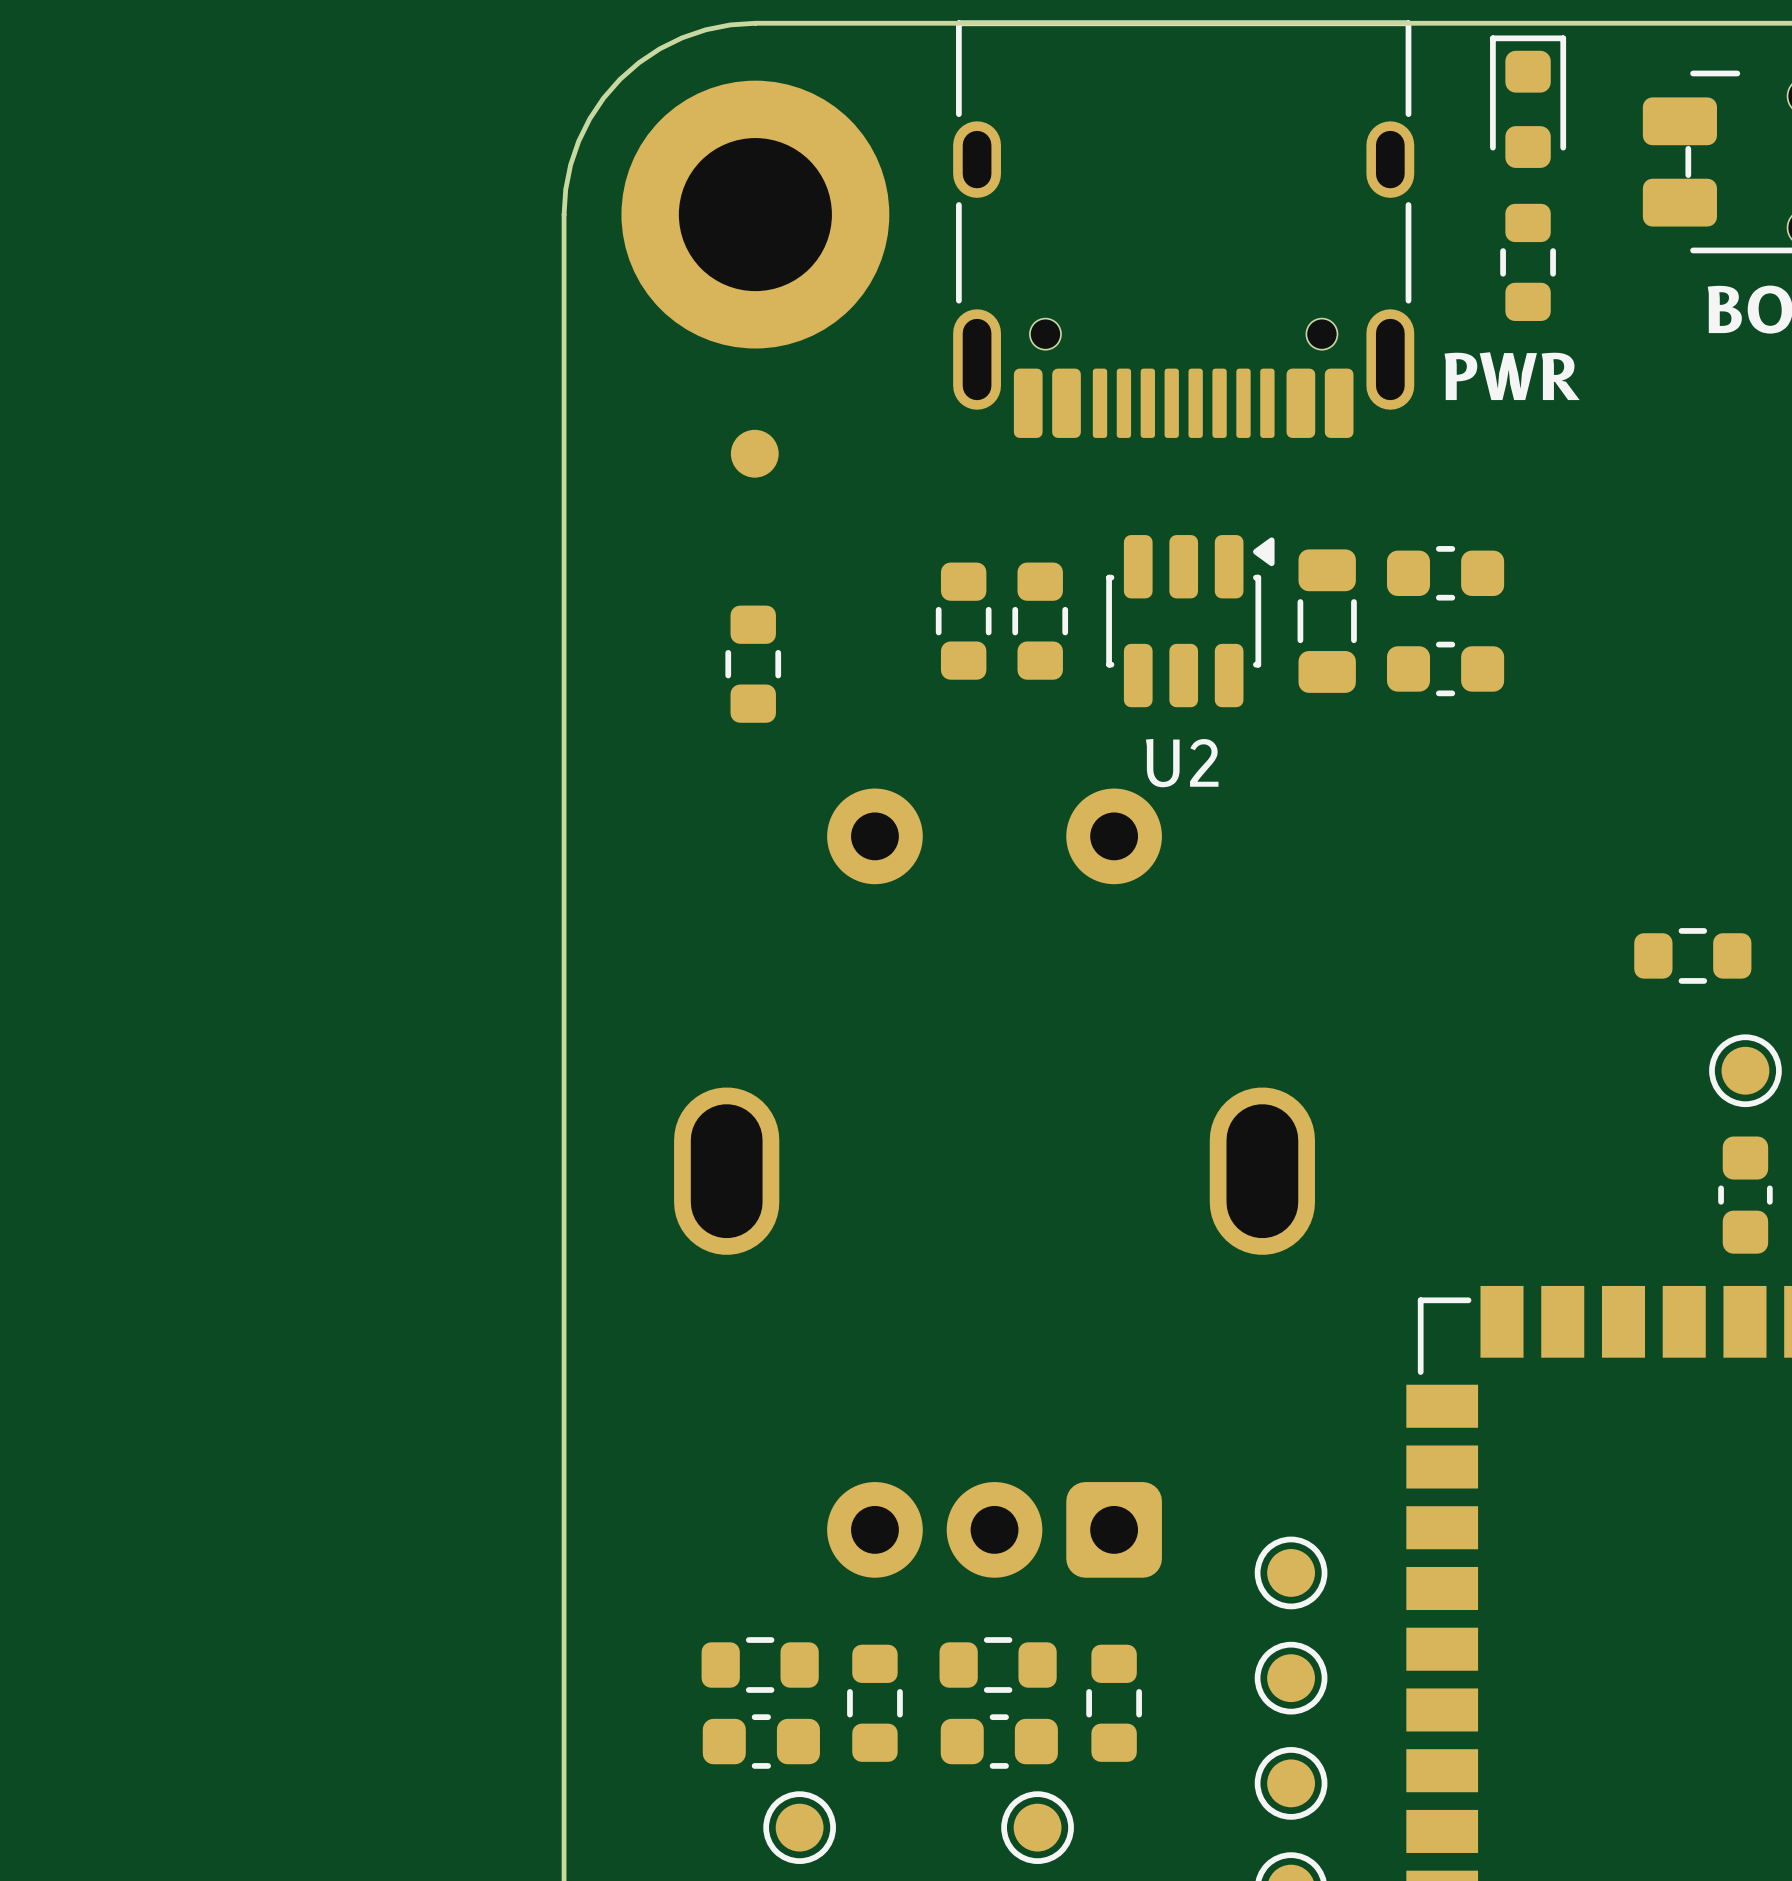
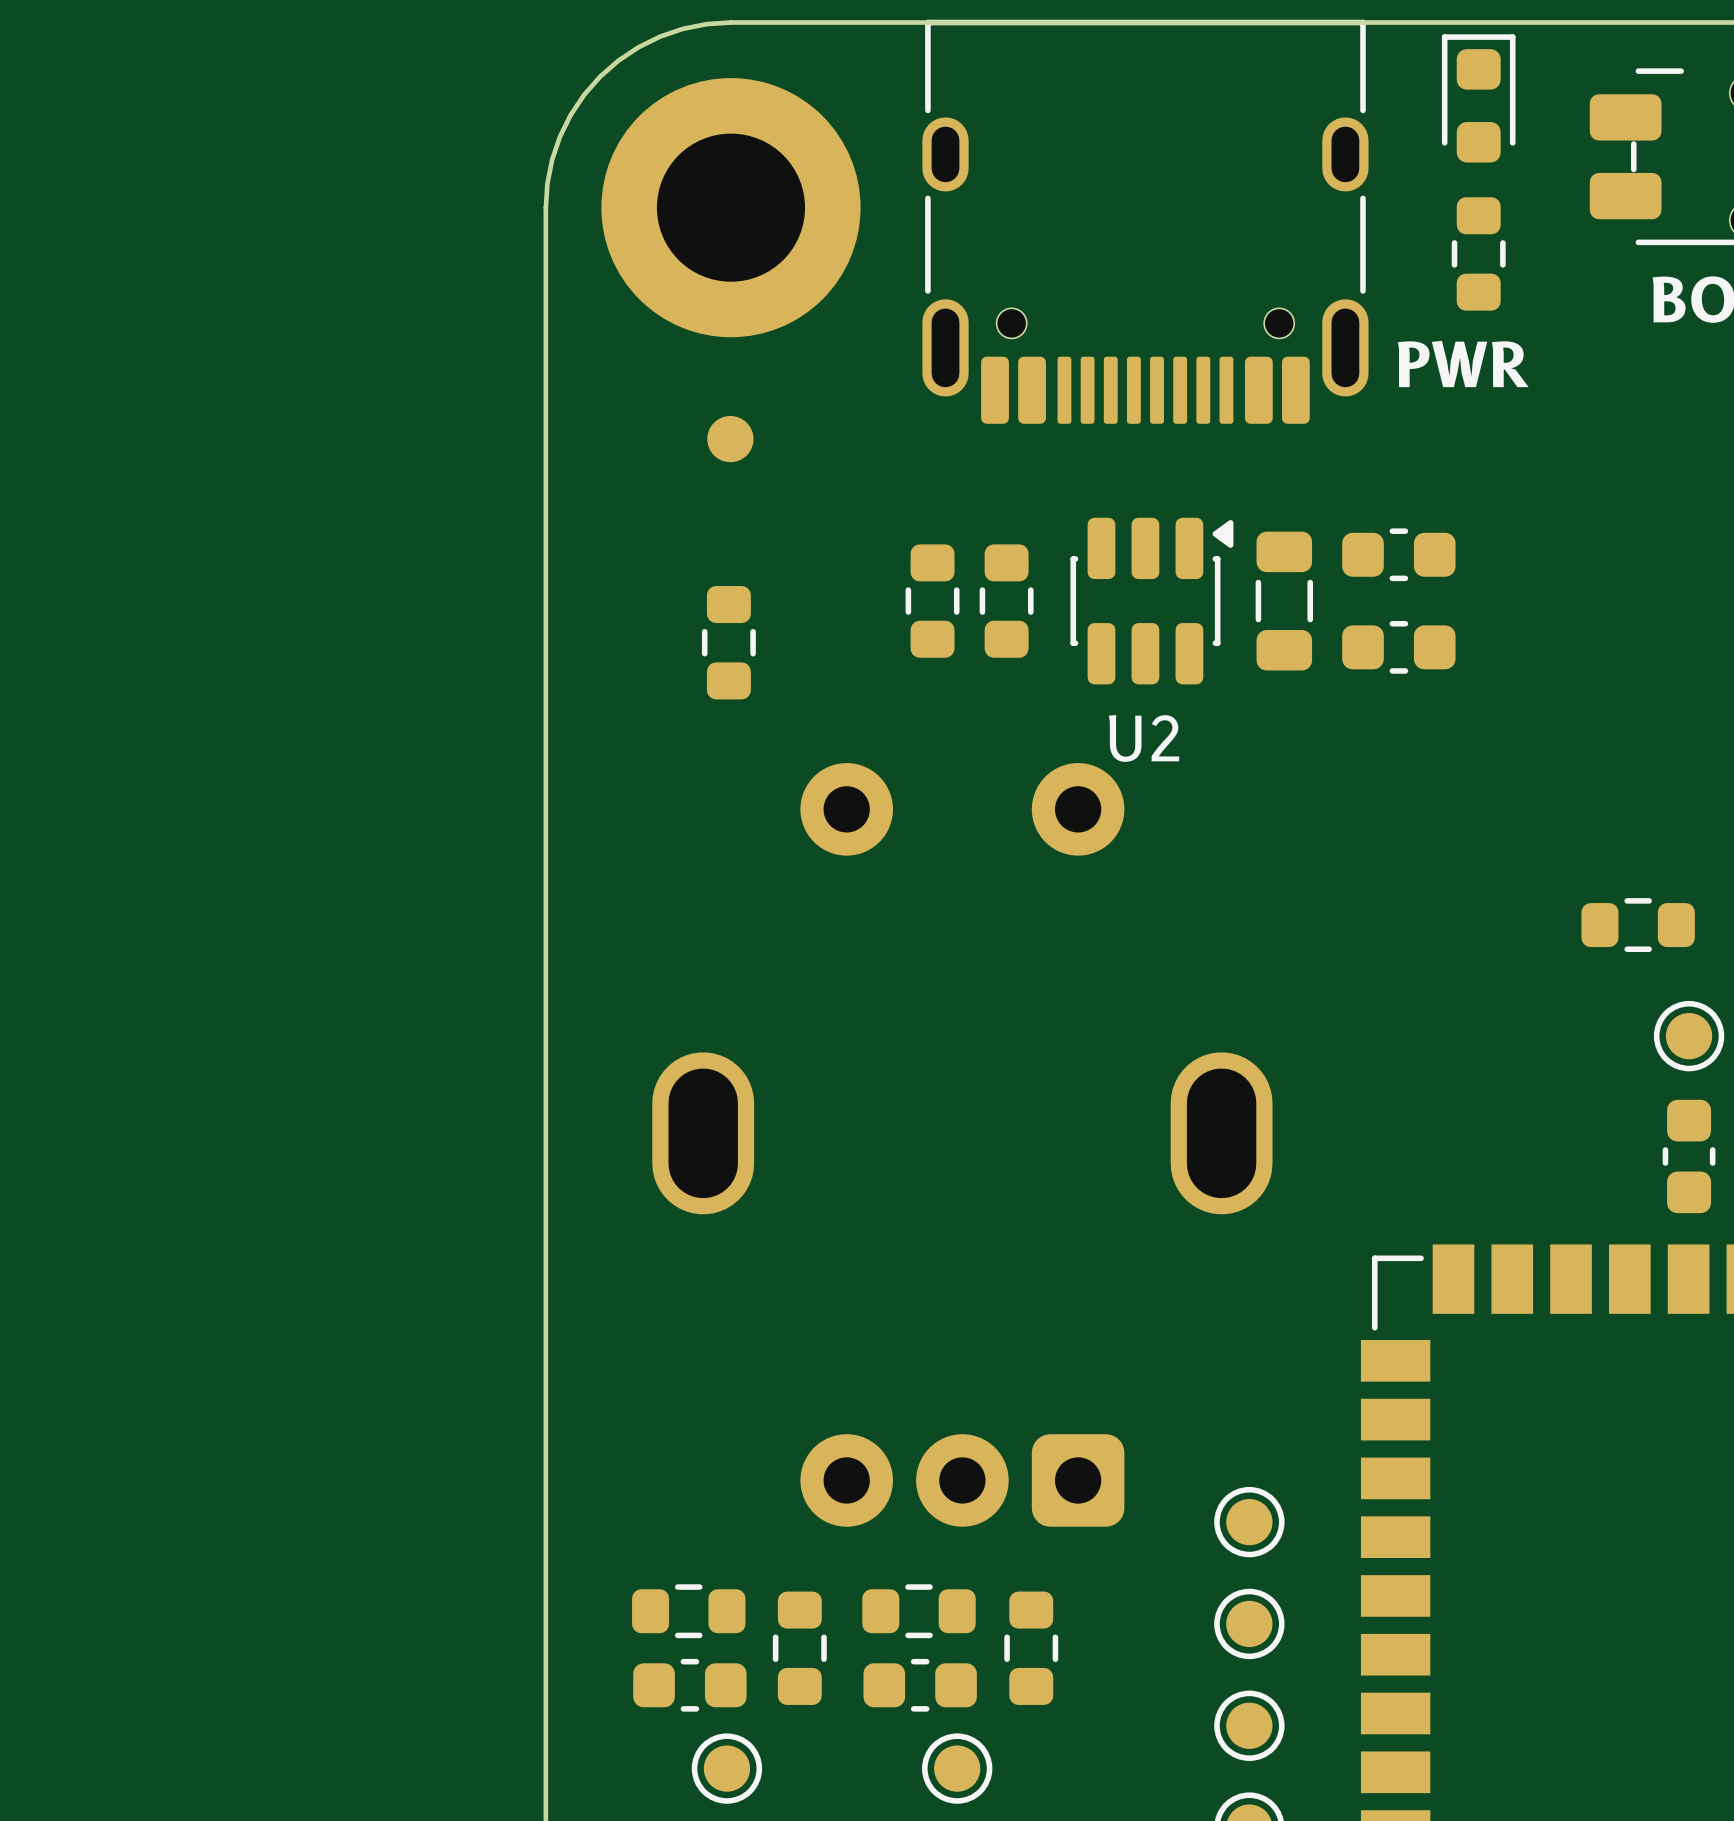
part: none -> (688, 1611)
part: (760, 1665) -> none
part: none -> (919, 1611)
part: (998, 1665) -> none
part: none -> (799, 1648)
part: (874, 1703) -> none
part: none -> (1031, 1648)
part: (1114, 1703) -> none
part position: (761, 1741) -> (689, 1685)
part position: (999, 1741) -> (920, 1685)
part position: (799, 1827) -> (726, 1768)
part position: (1037, 1827) -> (957, 1768)

